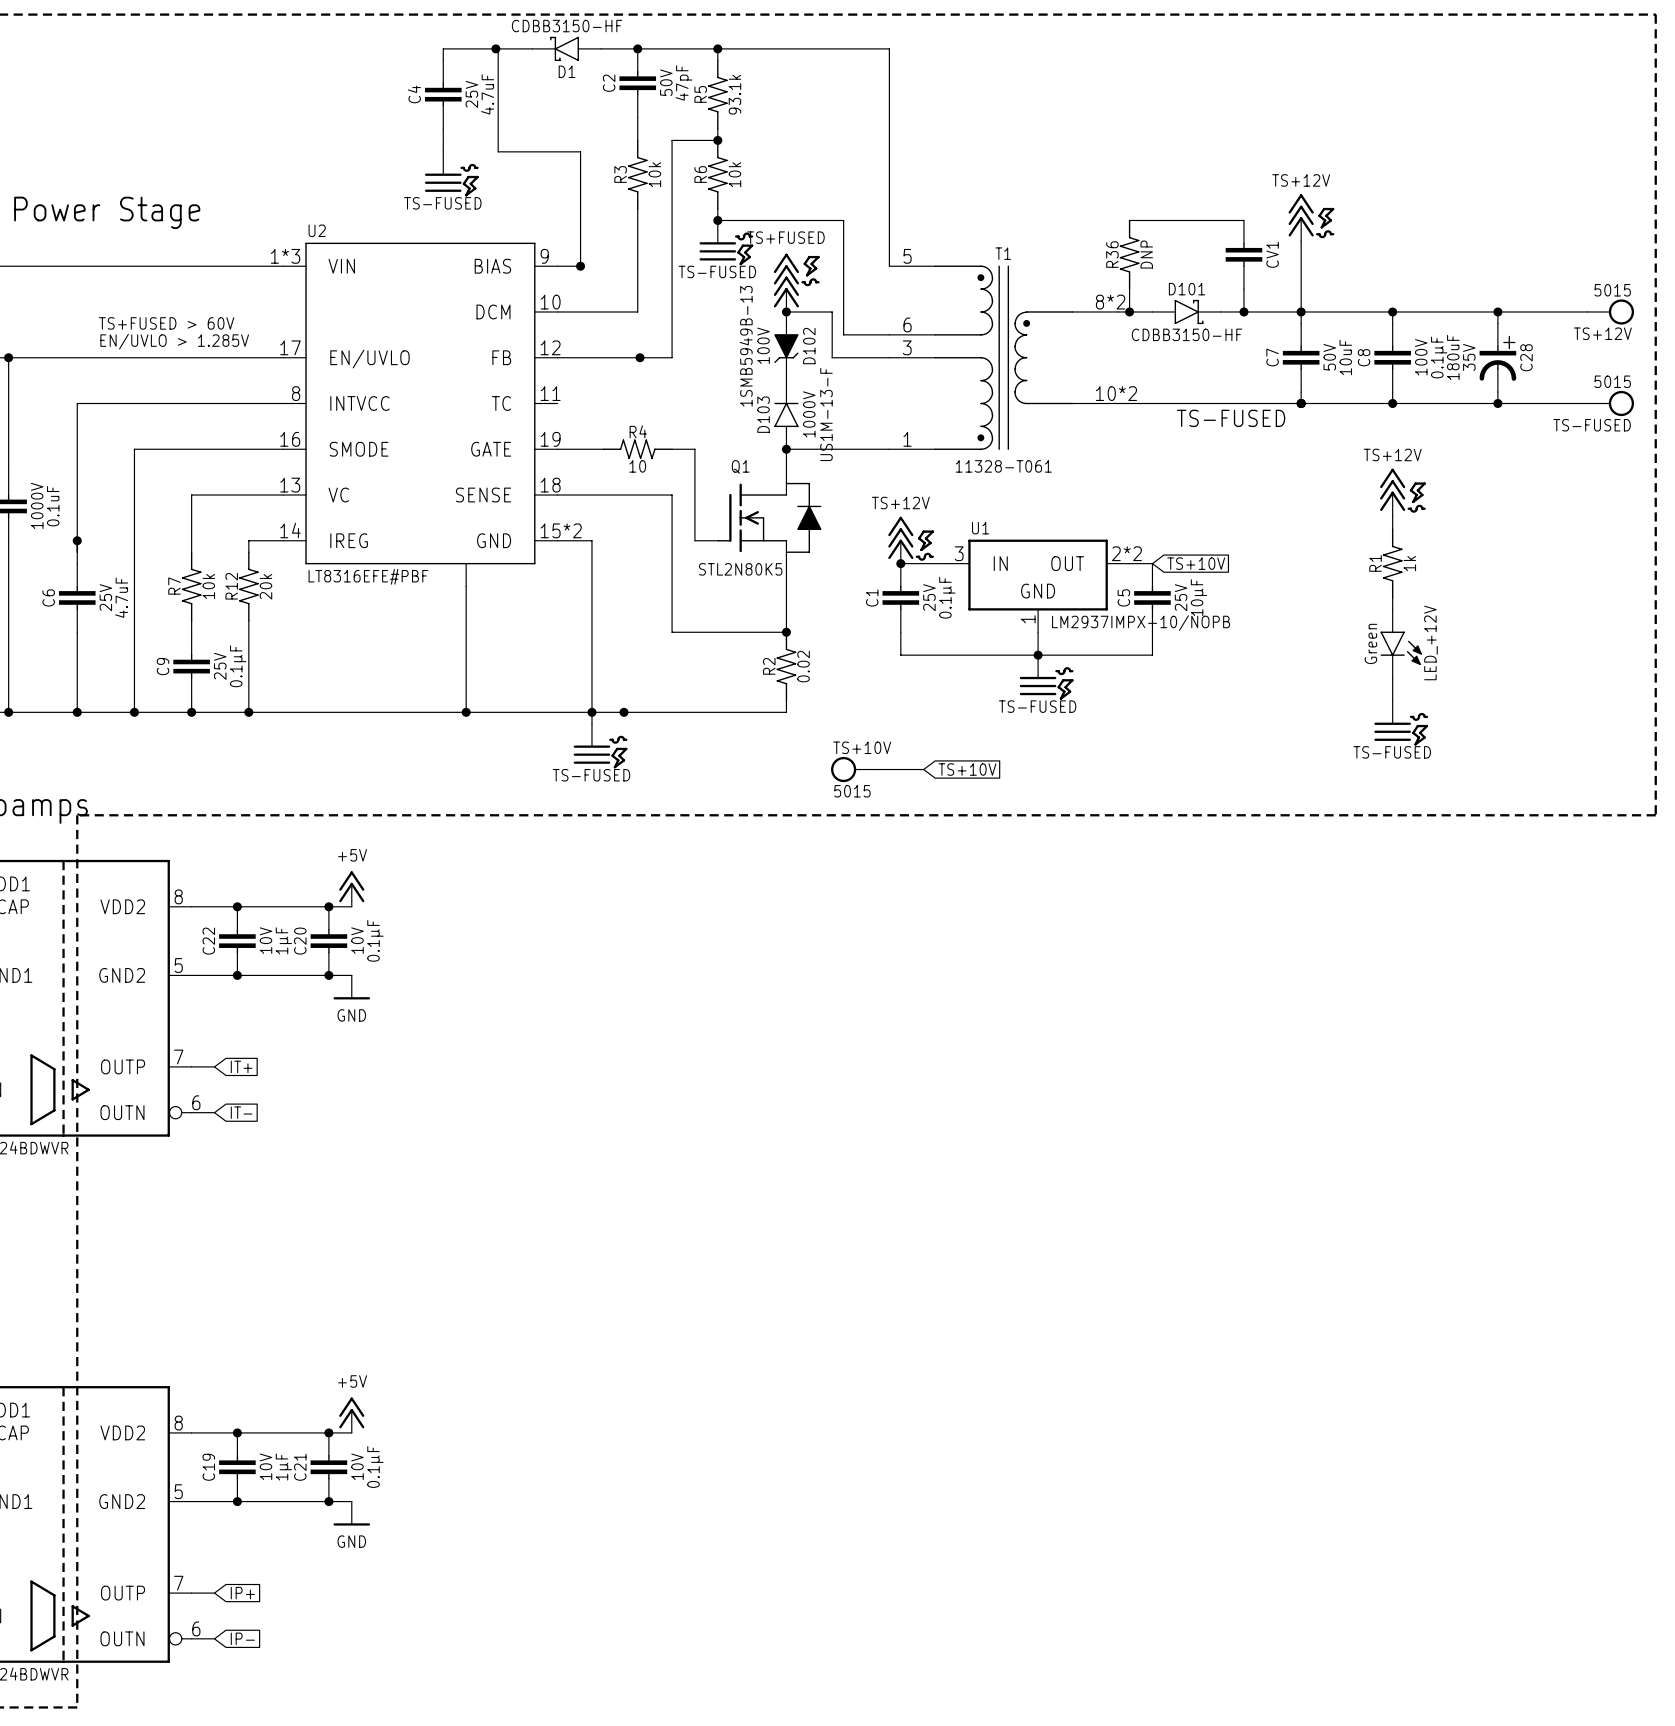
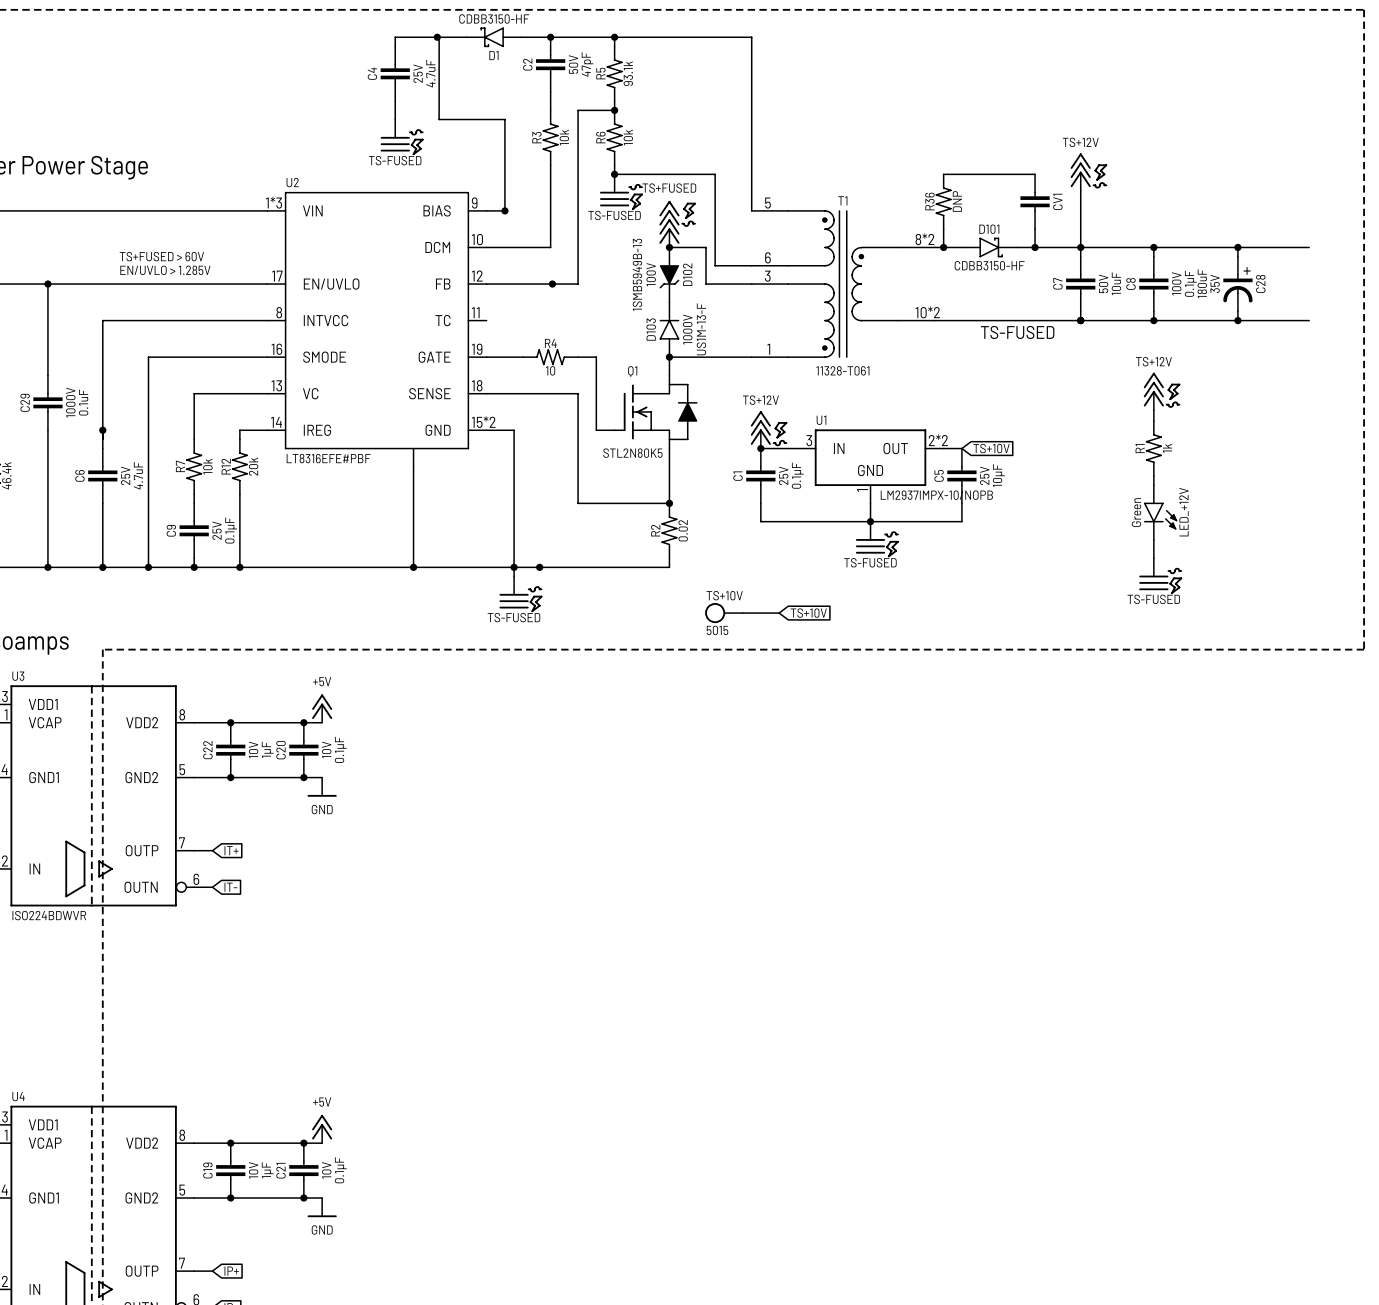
TS+12V: (1610, 311) -> none
TS-FUSED: (1610, 403) -> none

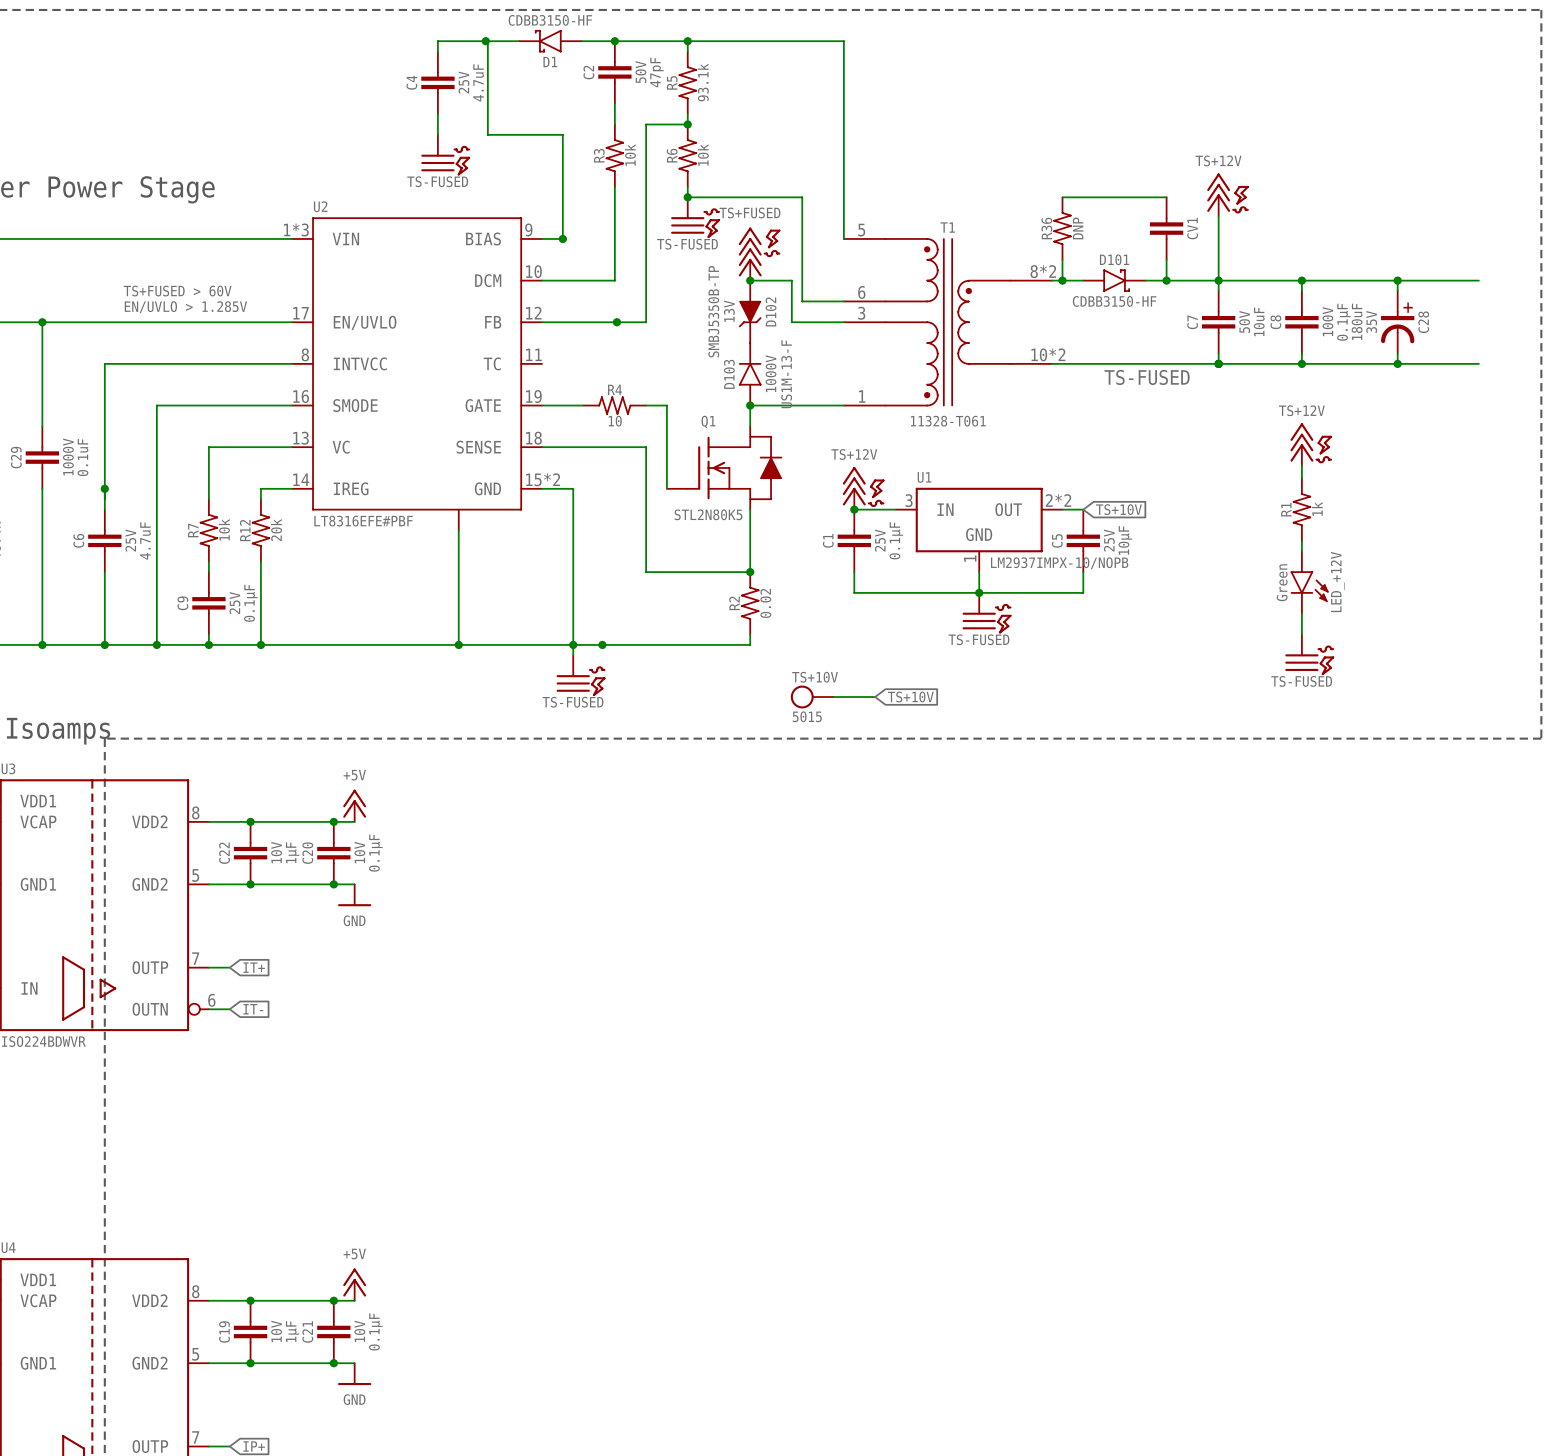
D102 text: 1SMB5949B-13 (637, 274) -> SMBJ5350B-TP (713, 311)
D102 text: 100V (651, 274) -> 13V (729, 311)

